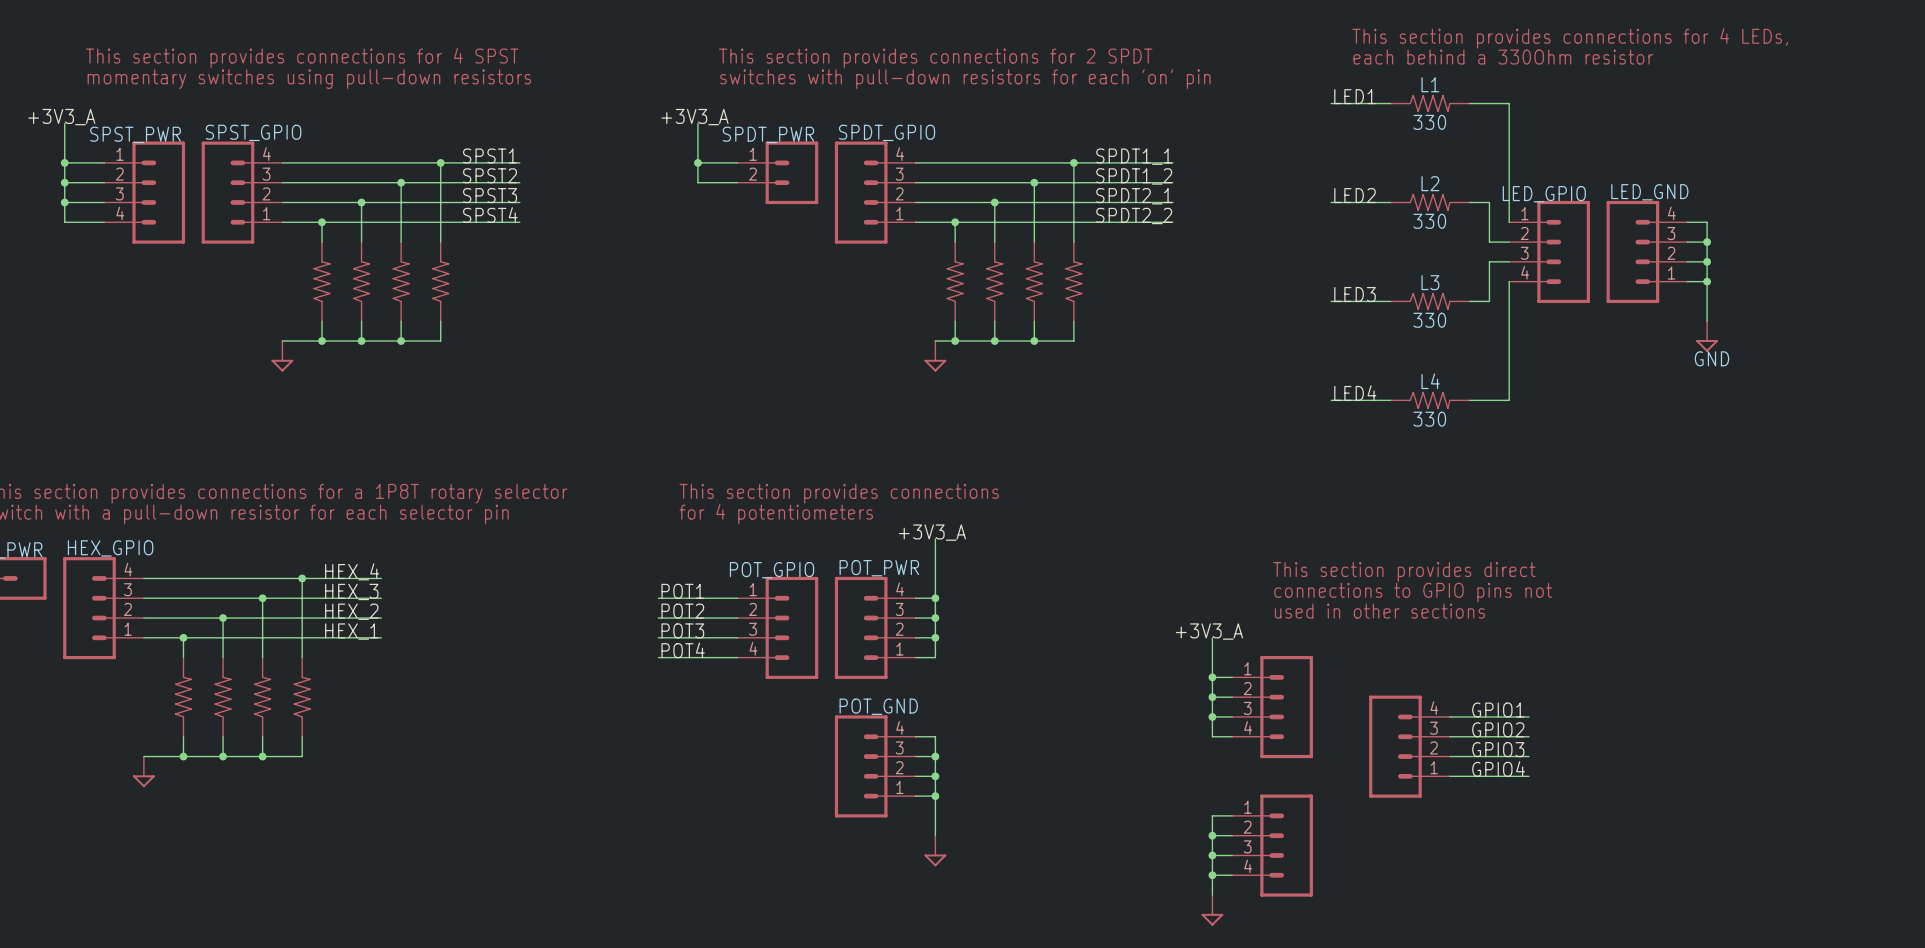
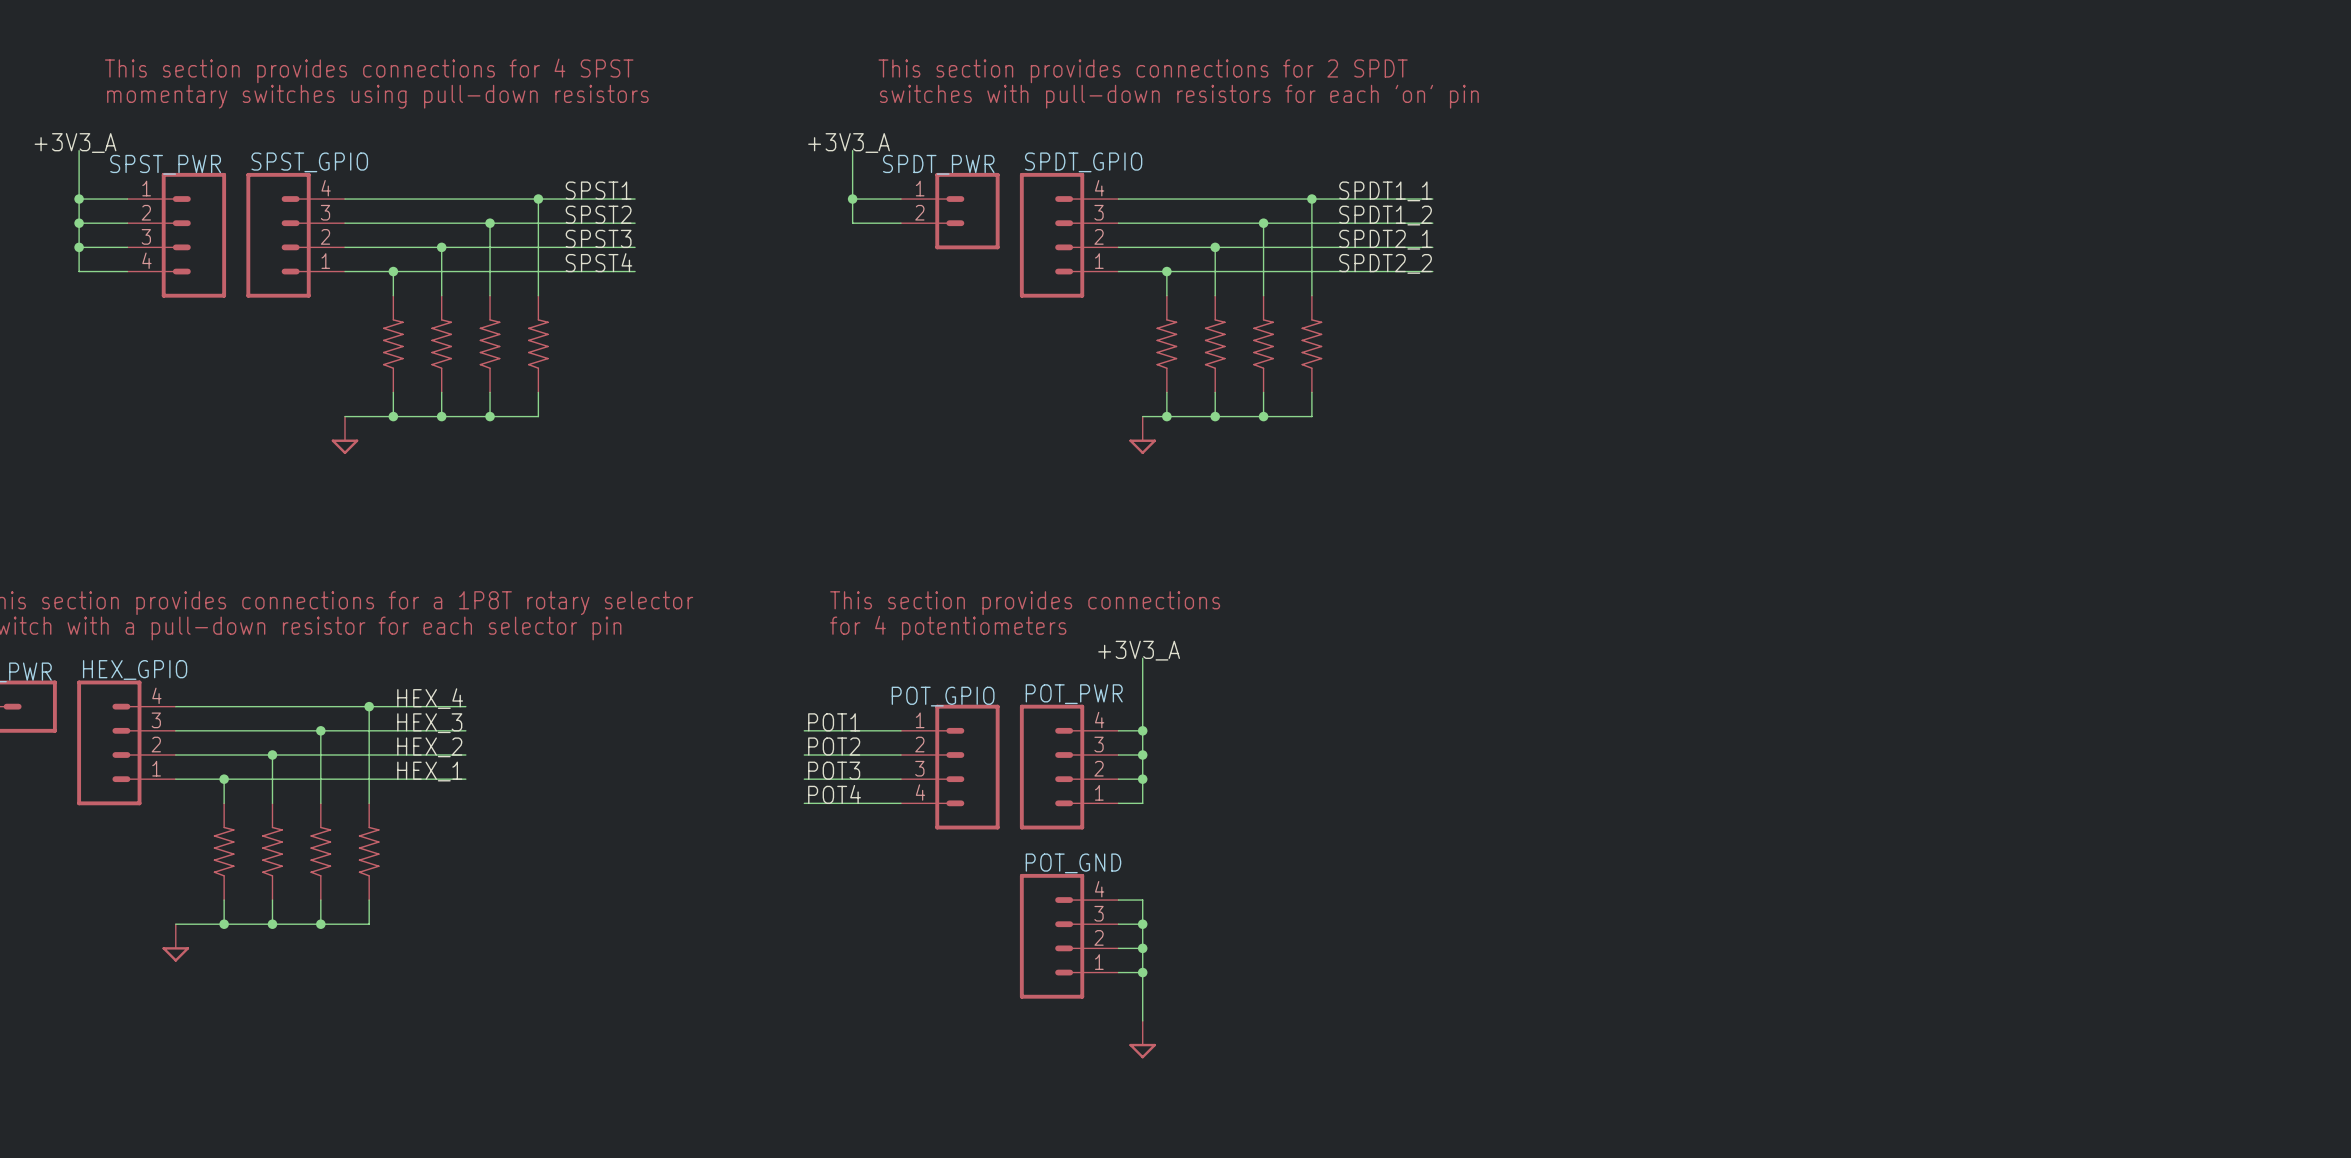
text: This section provides connections for 4 LEDs, (1570, 38) -> none
text: each behind a 330Ohm resistor (1503, 57) -> none
label: LED1 (1355, 96) -> none
wire: (1331, 103) (1390, 103) -> none
L1: 330 (1430, 103) -> none
wire: (1469, 103) (1509, 103) (1509, 222) -> none
label: LED2 (1355, 195) -> none
wire: (1331, 202) (1390, 202) -> none
L2: 330 (1430, 202) -> none
wire: (1469, 202) (1489, 202) (1489, 242) (1509, 242) -> none
wire: (1687, 222) (1707, 222) (1707, 321) -> none
wire: (1687, 242) (1707, 242) -> none
junction: (1707, 242) -> none
LED_GPIO: (1549, 251) -> none
LED_GND: (1646, 251) -> none
wire: (1509, 261) (1489, 261) (1489, 301) (1469, 301) -> none
wire: (1687, 261) (1707, 261) -> none
junction: (1707, 261) -> none
wire: (1509, 281) (1509, 400) (1469, 400) -> none
wire: (1687, 281) (1707, 281) -> none
junction: (1707, 281) -> none
label: LED3 (1355, 294) -> none
wire: (1331, 301) (1390, 301) -> none
L3: 330 (1430, 301) -> none
power symbol: GND (1707, 336) -> none
label: LED4 (1355, 393) -> none
wire: (1331, 400) (1390, 400) -> none
L4: 330 (1430, 400) -> none
text: This section provides direct (1404, 571) -> none
text: connections to GPIO pins not (1413, 592) -> none
text: used in other sections (1379, 611) -> none
label: +3V3_A (1209, 631) -> none
wire: (1212, 637) (1212, 736) (1232, 736) -> none
wire: (1212, 677) (1232, 677) -> none
junction: (1212, 677) -> none
wire: (1212, 697) (1232, 697) -> none
junction: (1212, 697) -> none
part: (1272, 707) -> none
label: GPIO1 (1498, 710) -> none
wire: (1212, 716) (1232, 716) -> none
junction: (1212, 716) -> none
wire: (1449, 716) (1529, 716) -> none
label: GPIO2 (1498, 729) -> none
wire: (1449, 736) (1529, 736) -> none
part: (1409, 746) -> none
label: GPIO3 (1498, 749) -> none
wire: (1449, 756) (1529, 756) -> none
label: GPIO4 (1498, 769) -> none
wire: (1449, 776) (1529, 776) -> none
wire: (1232, 815) (1212, 815) (1212, 895) -> none
wire: (1212, 835) (1232, 835) -> none
junction: (1212, 835) -> none
part: (1272, 845) -> none
wire: (1212, 855) (1232, 855) -> none
junction: (1212, 855) -> none
wire: (1212, 875) (1232, 875) -> none
junction: (1212, 875) -> none
power symbol: (1212, 910) -> none

